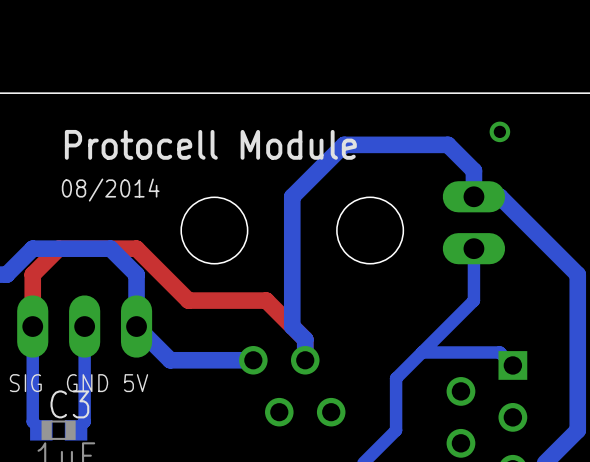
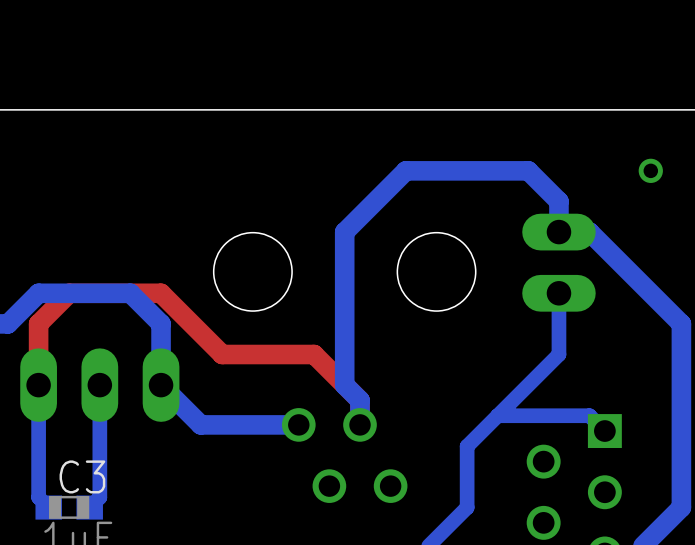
via position: (499, 131) -> (650, 170)
text: Protocell Module (210, 144) -> none
text: 08/2014 (110, 190) -> none
text: SIG (25, 383) -> none
text: GND (87, 383) -> none
text: 5V (136, 383) -> none

